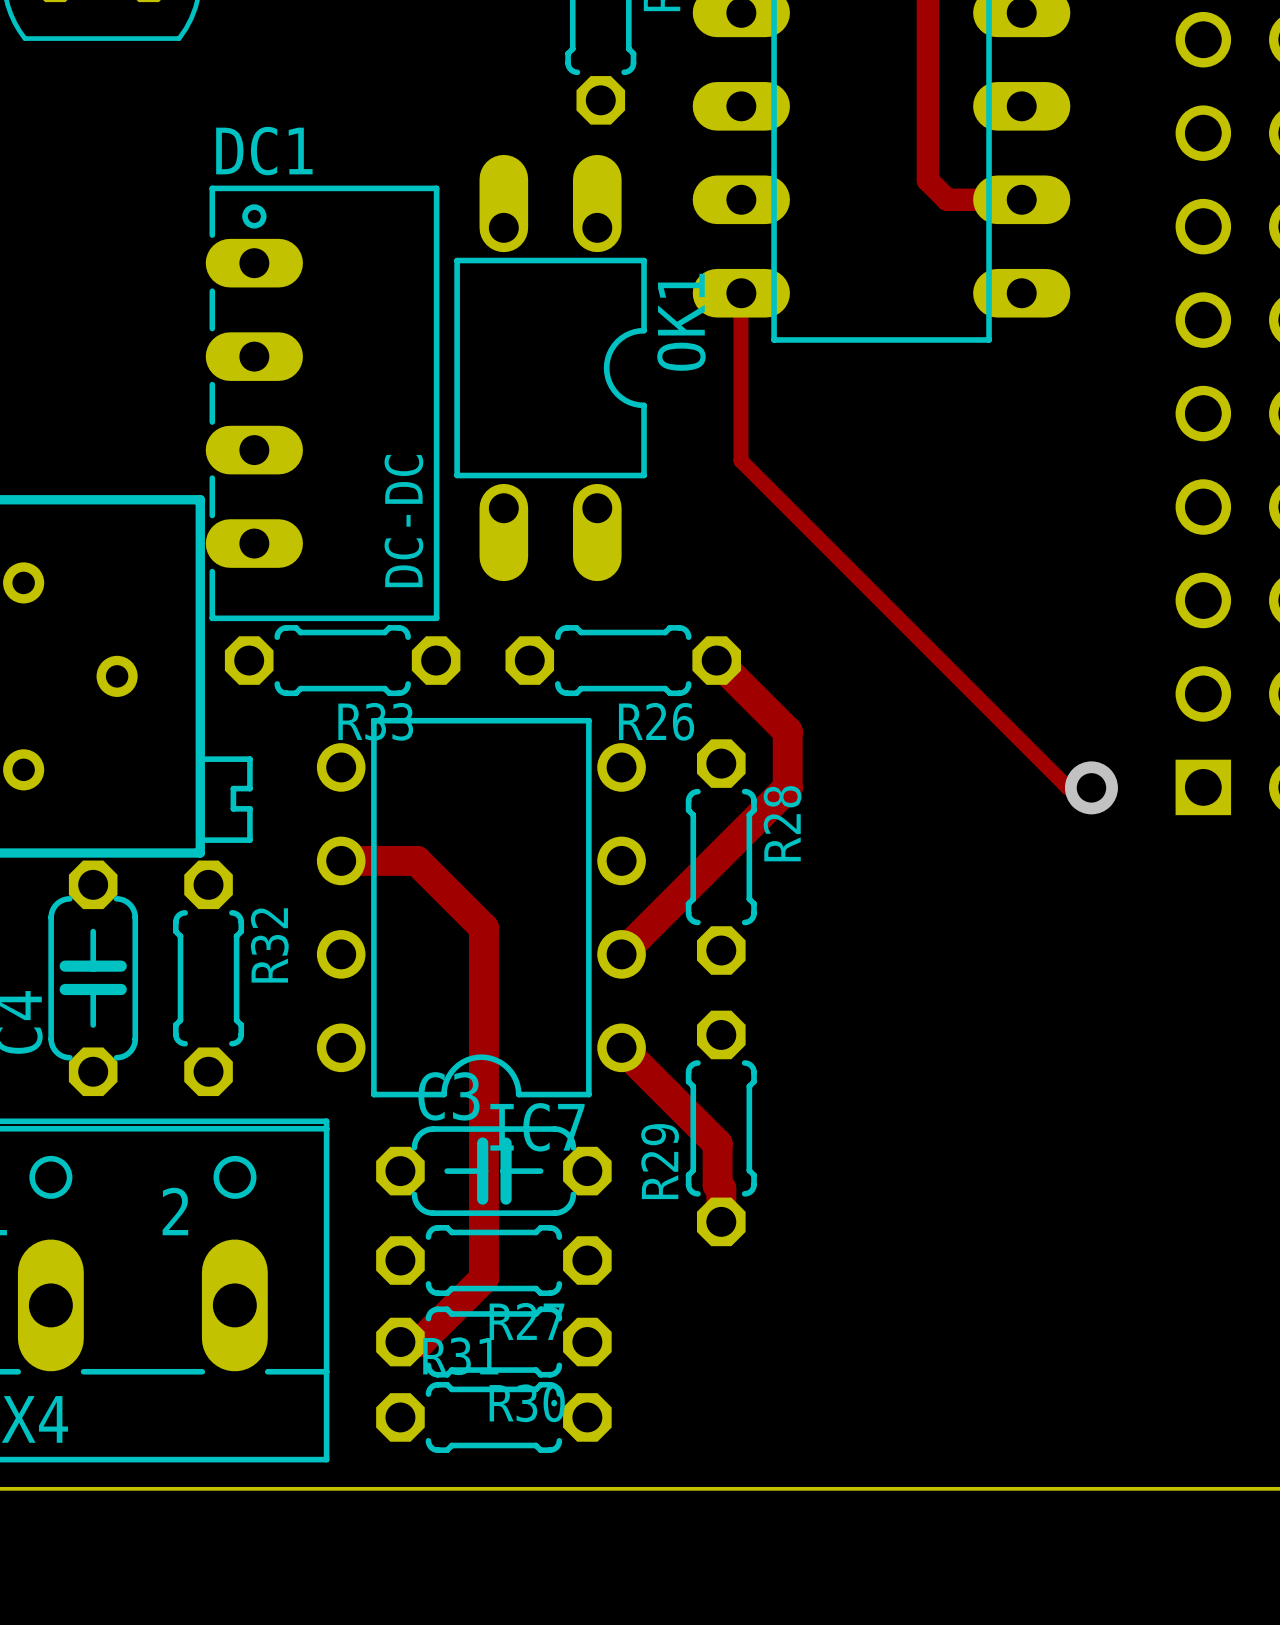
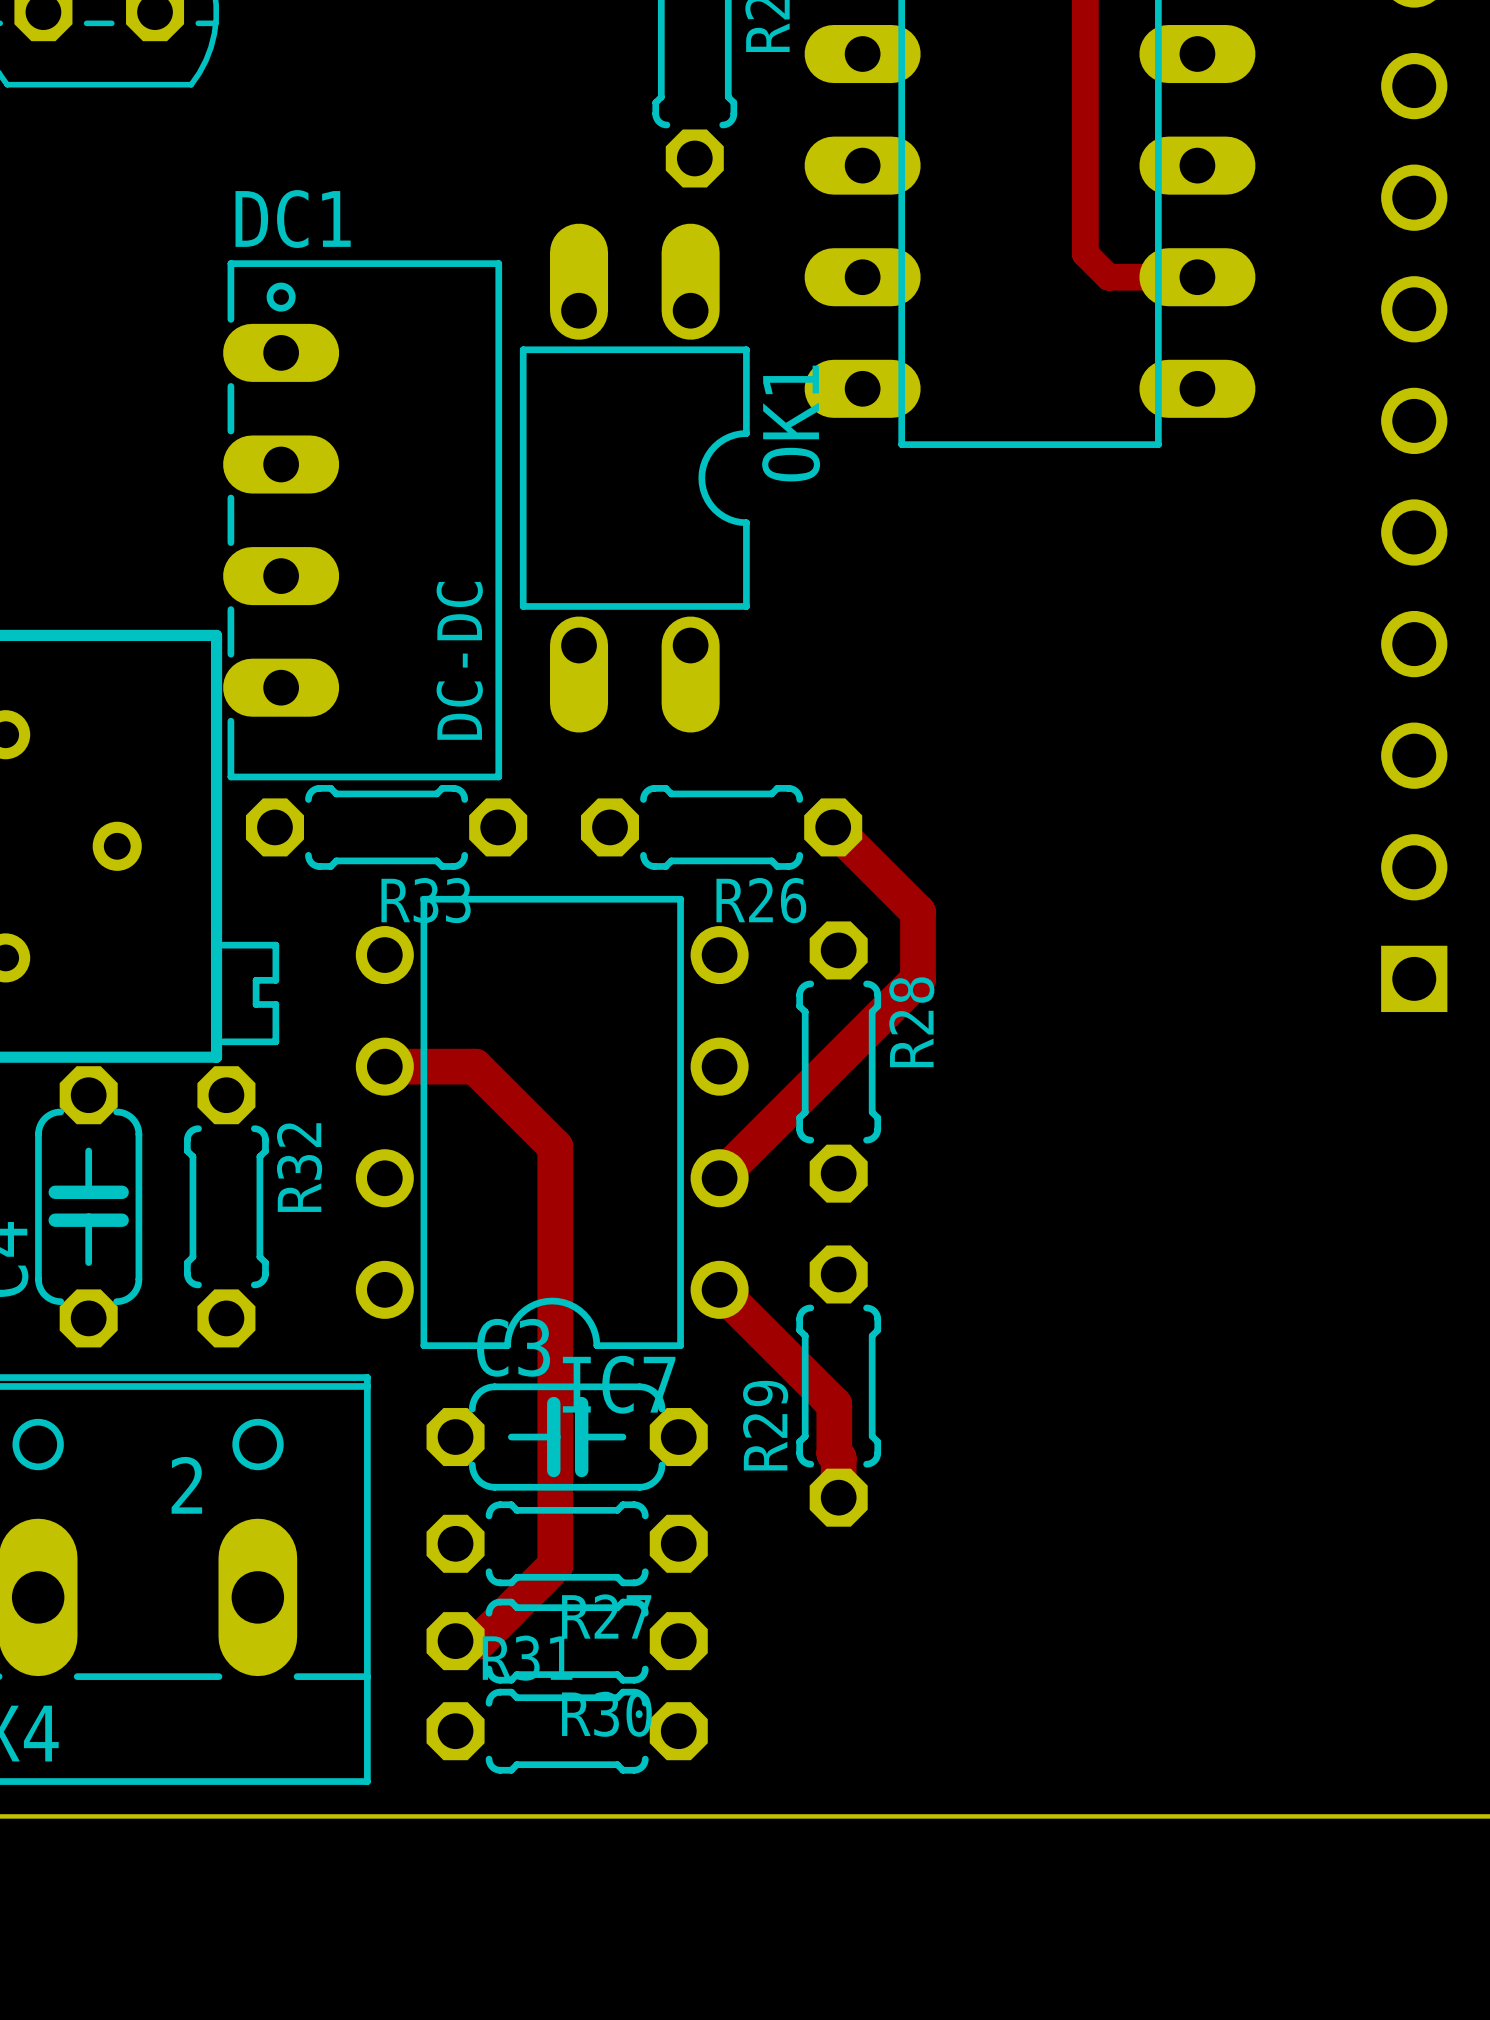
track: (740, 293) (740, 460) (1068, 787) (1091, 787) -> none
via: (1091, 787) -> none

